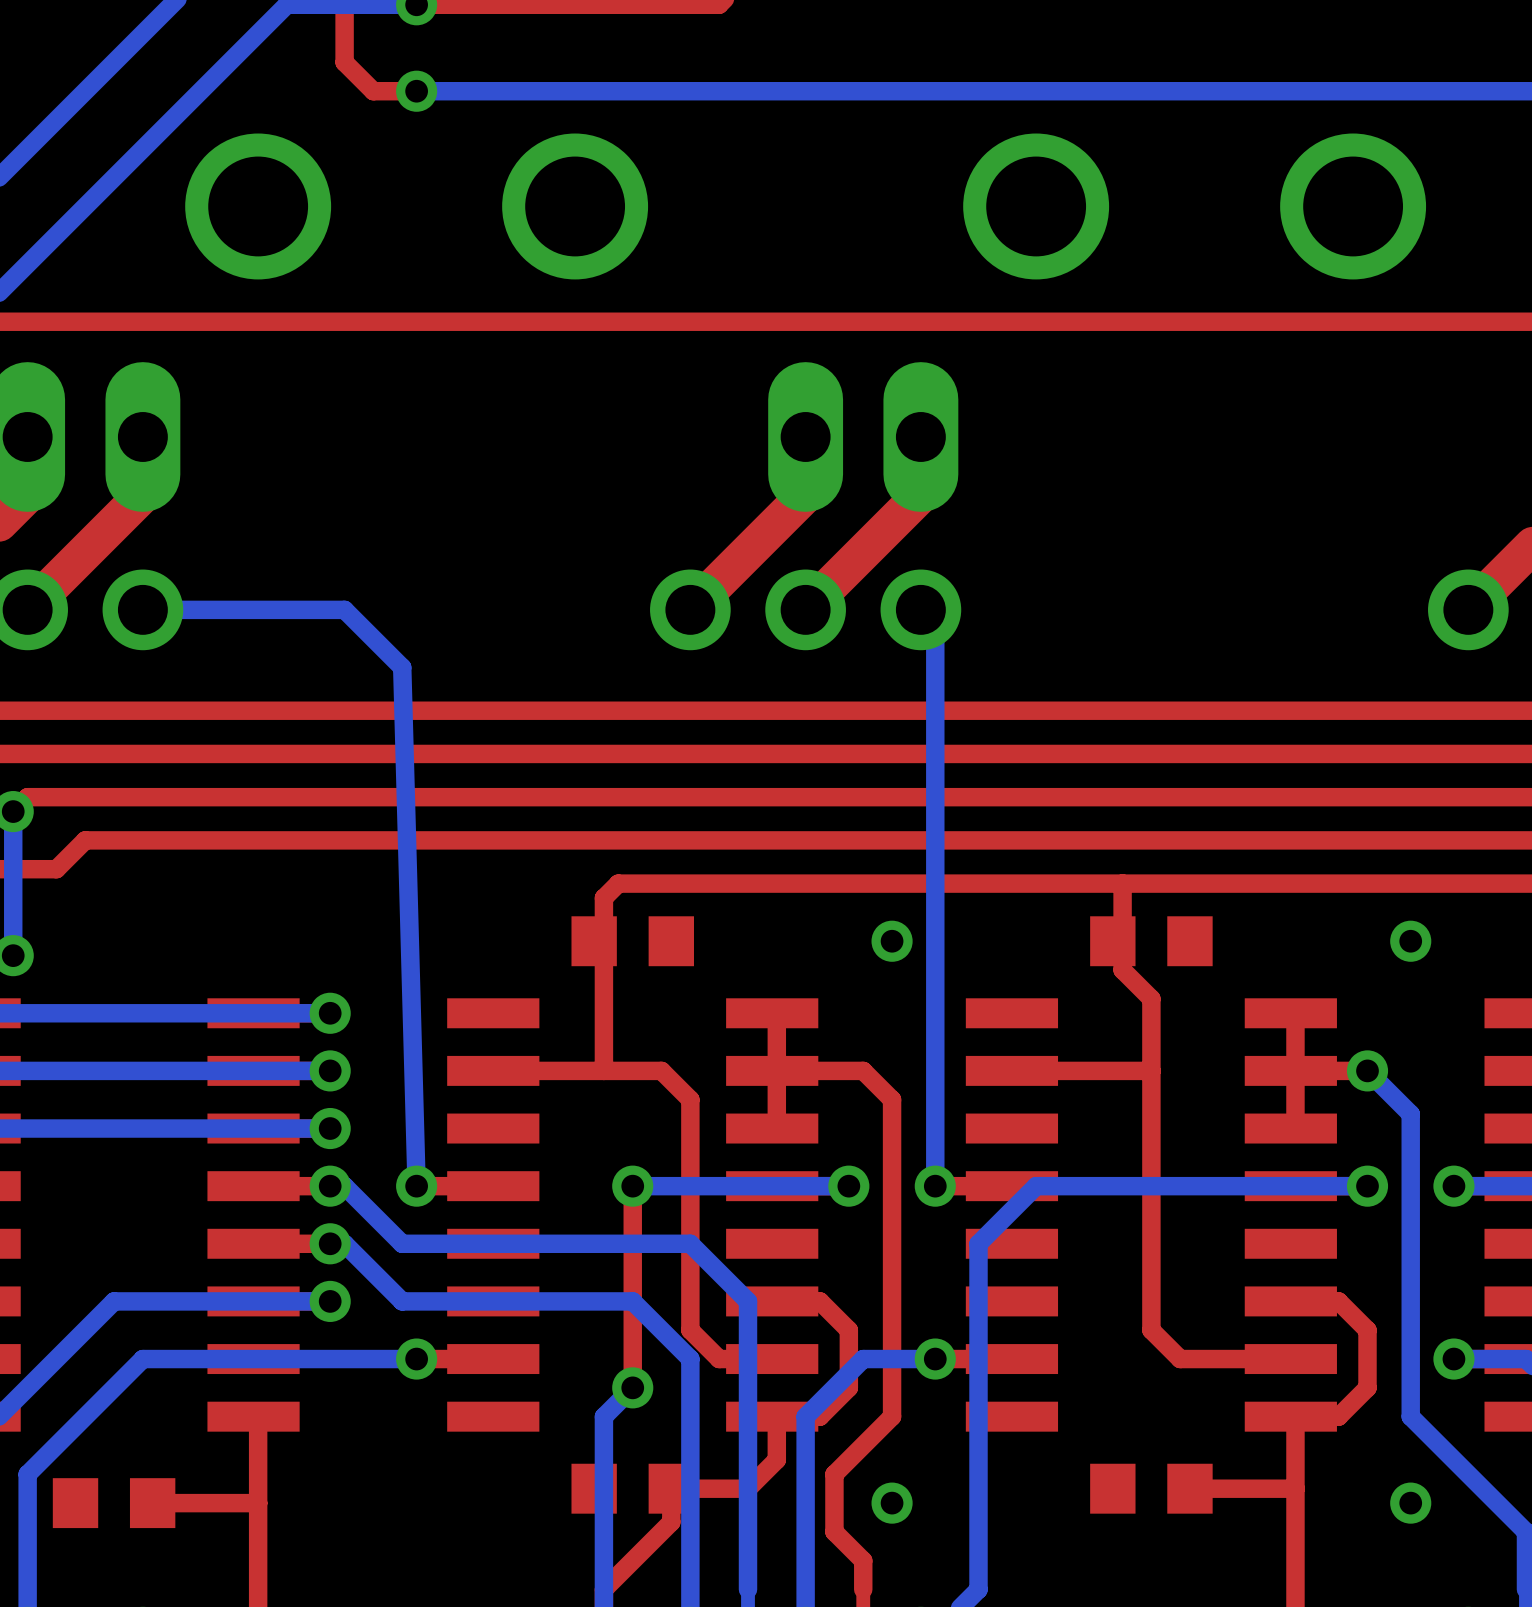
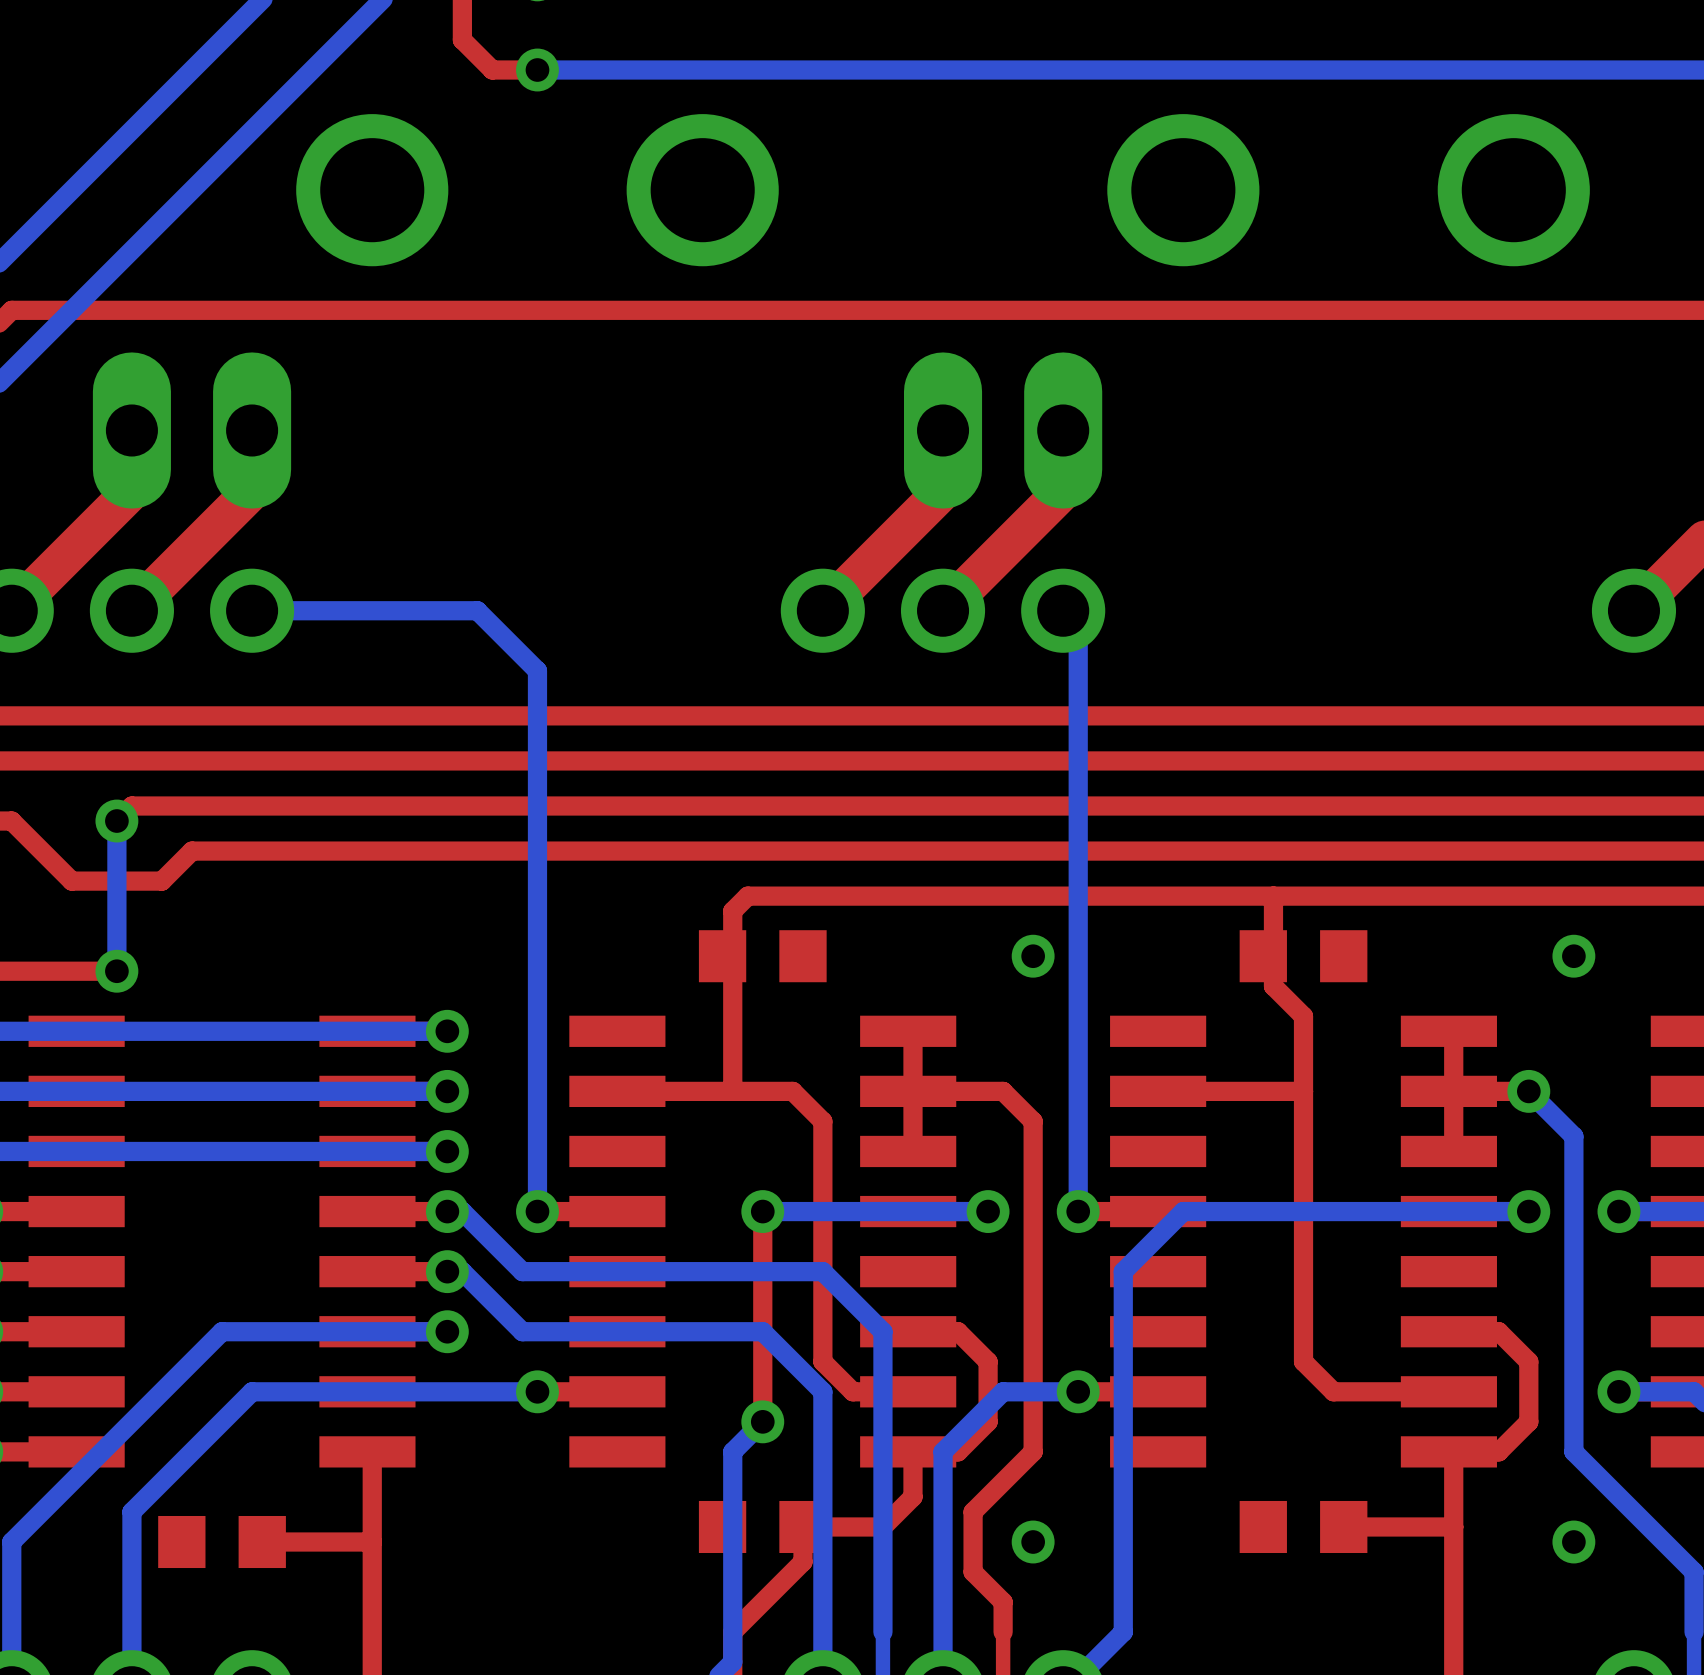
bottom track: (344, 609) (402, 667) (416, 1186) -> (462, 610) (477, 610) (537, 670) (537, 1211)

